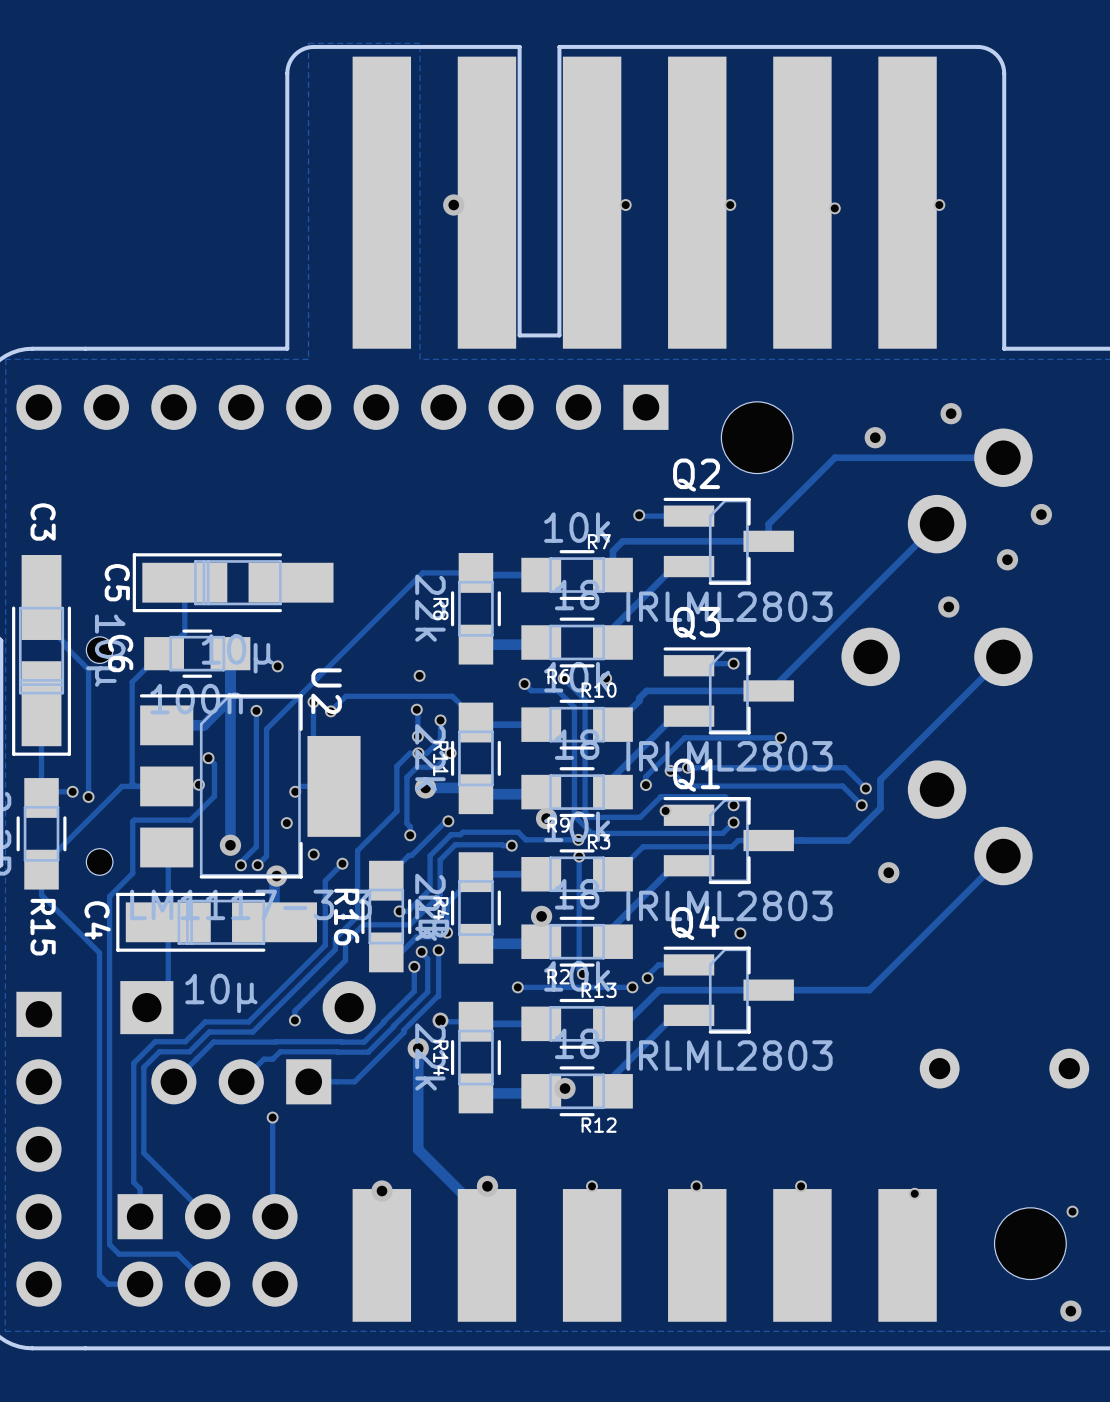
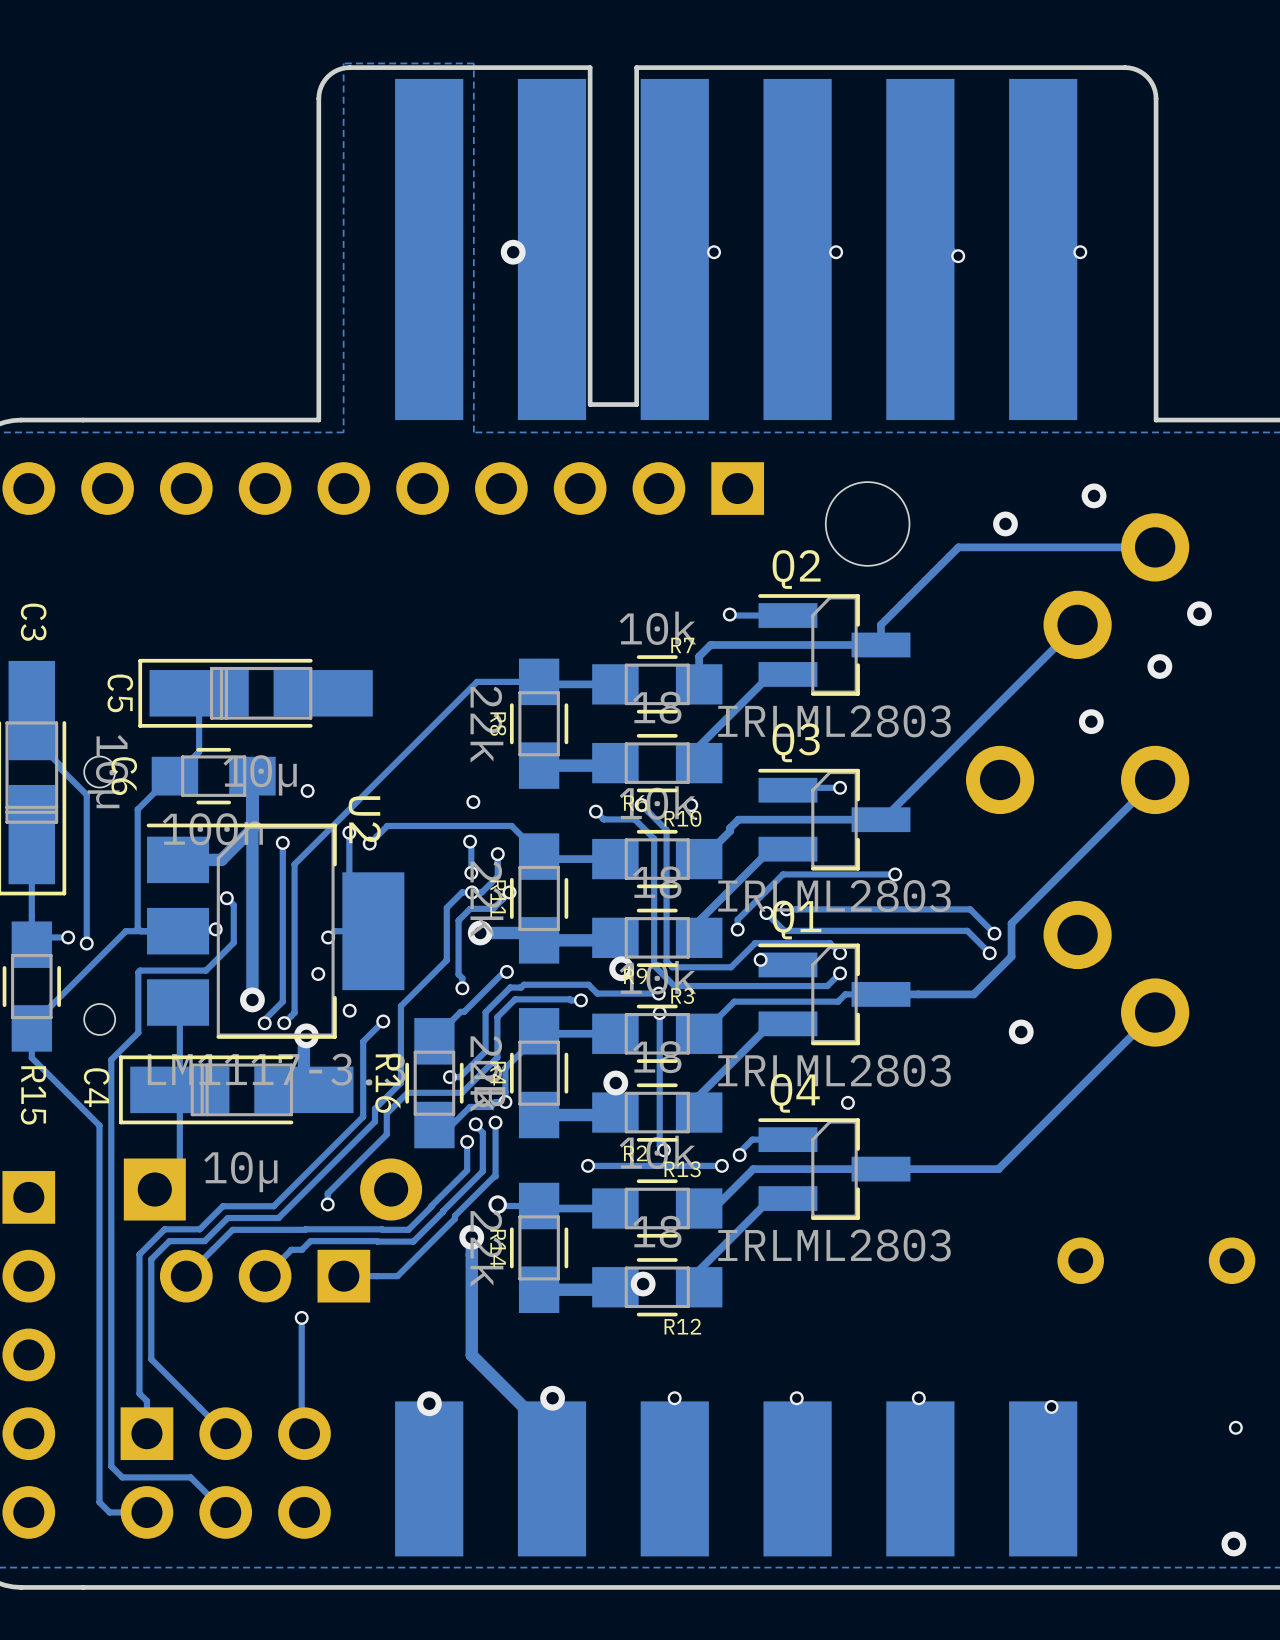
part: (1030, 1243) -> none

